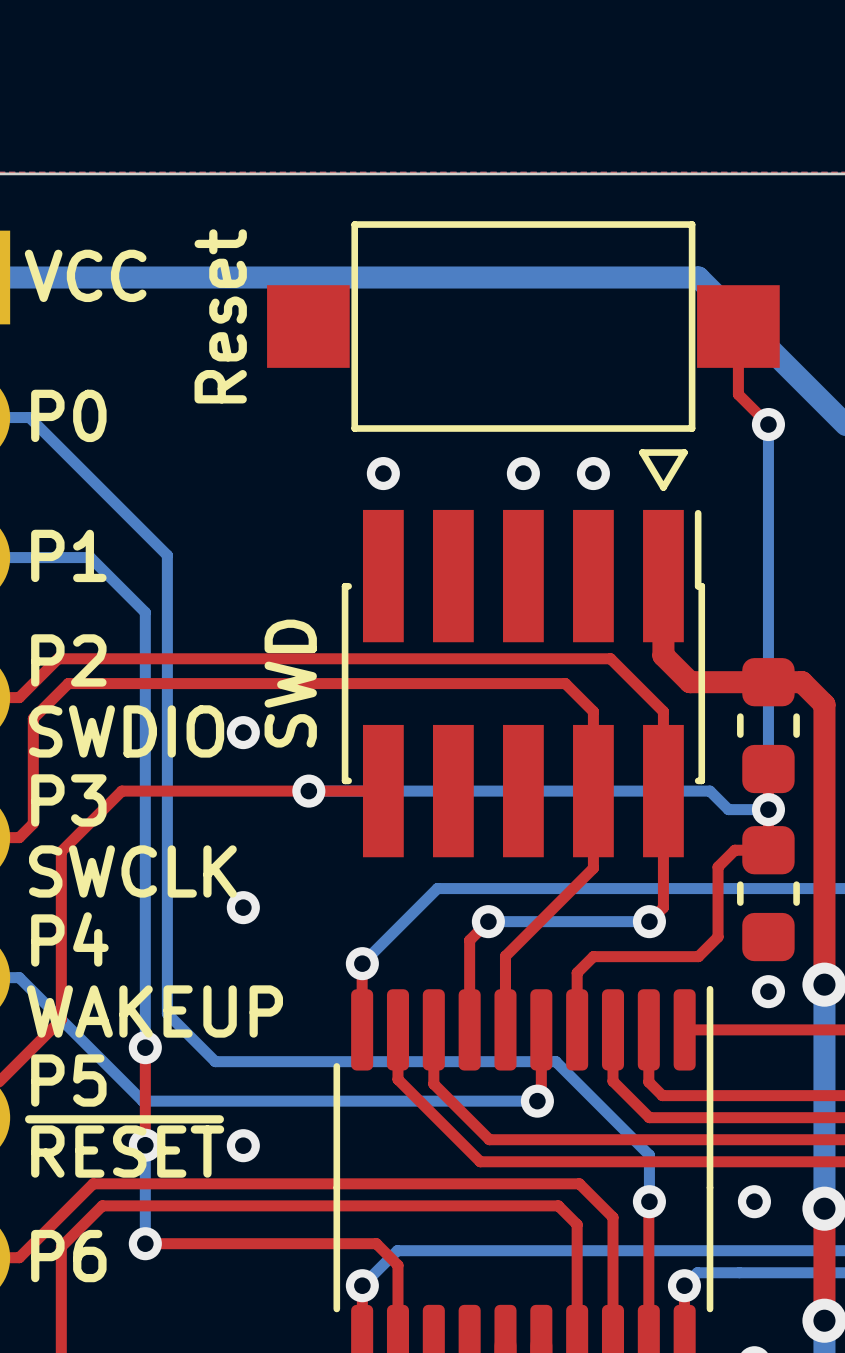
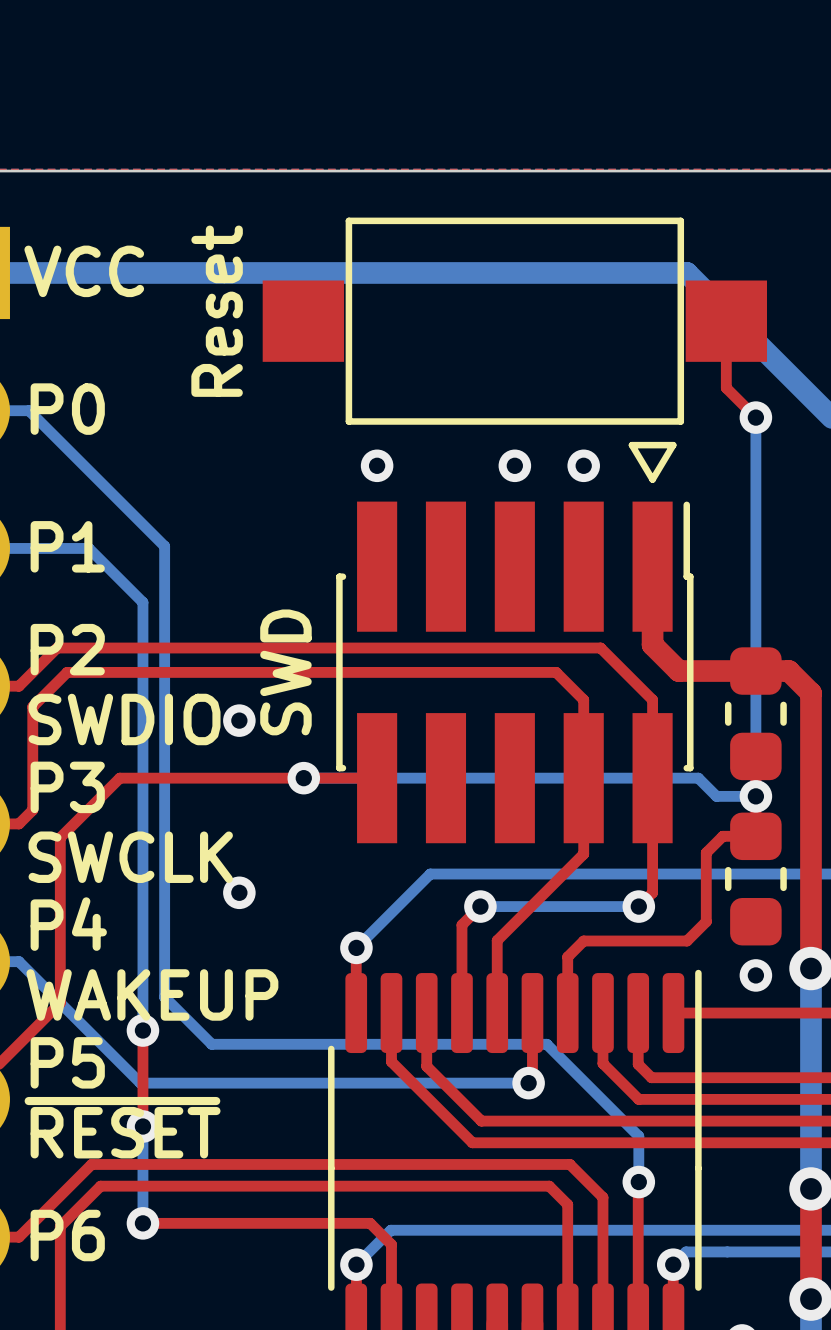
via: (243, 1145) -> none
via: (754, 1201) -> none

